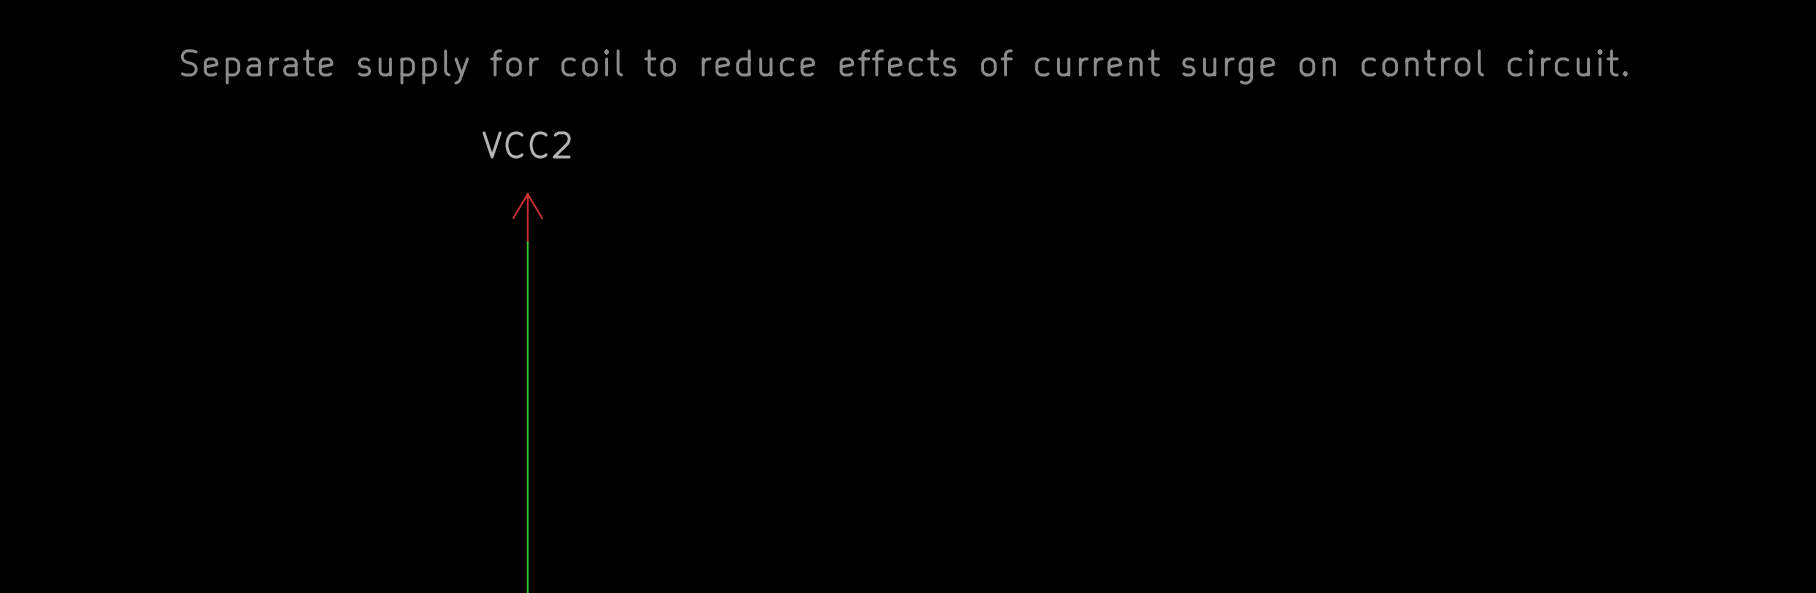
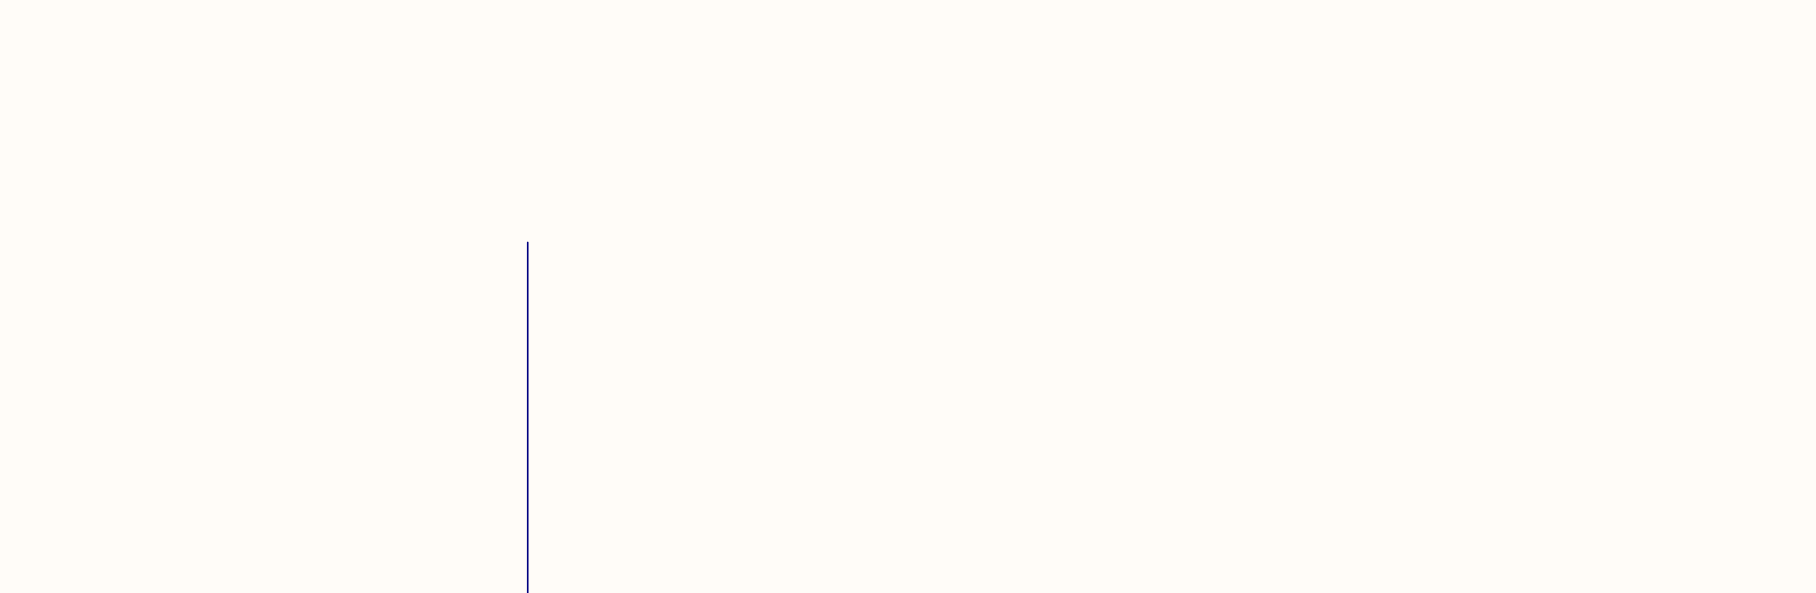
text: Separate supply for coil to reduce effects of current surge on control circuit. (904, 66) -> none
power symbol: VCC2 (527, 218) -> none

